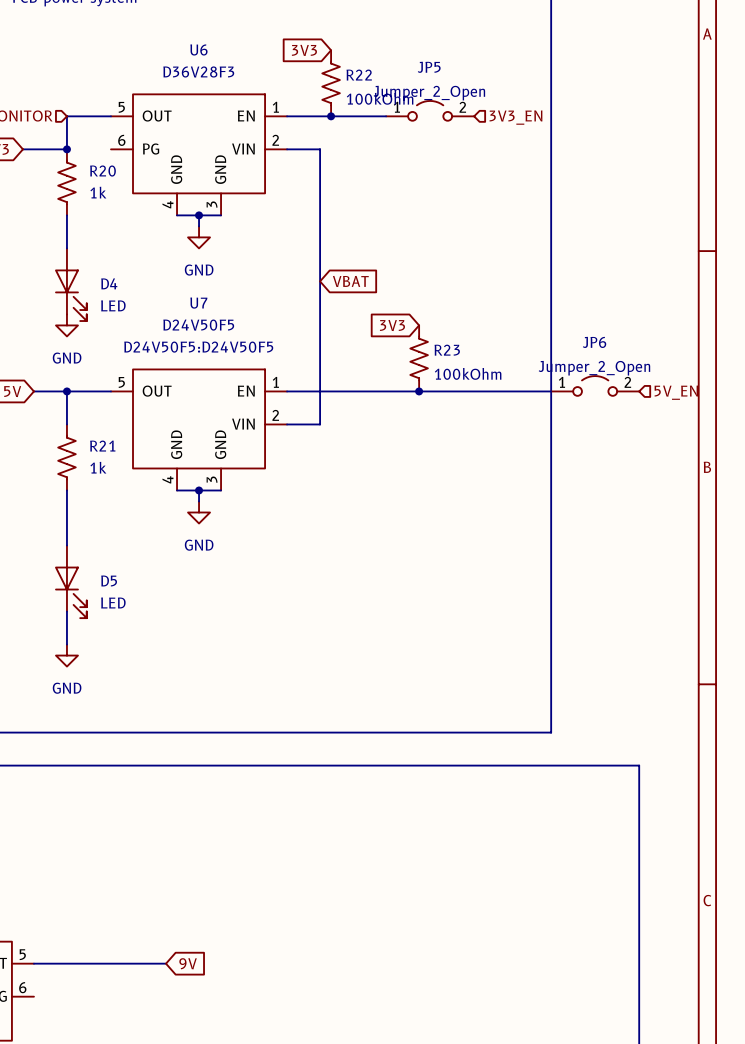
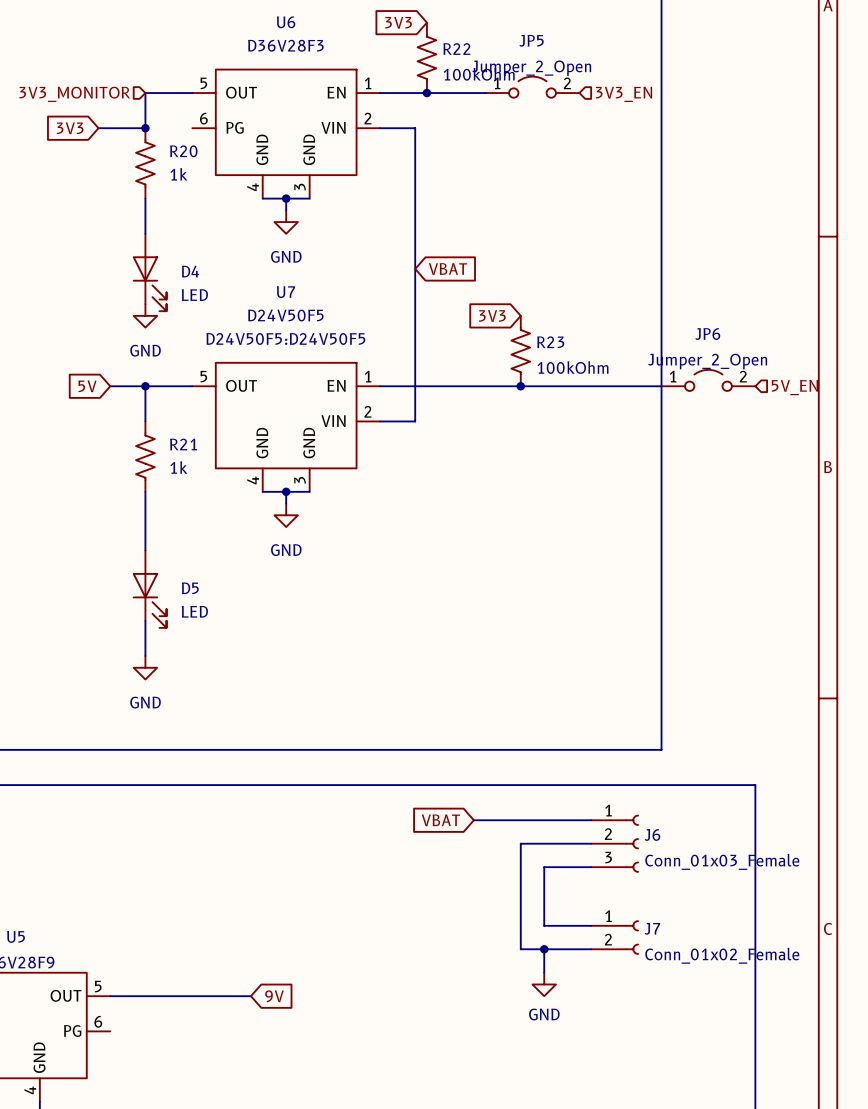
global label: none -> VBAT (440, 820)
wire: none -> (473, 820) (591, 820)
wire: none -> (591, 843) (520, 843) (520, 949) (591, 949)
J6: none -> Conn_01x03_Female (614, 843)
wire: none -> (591, 867) (544, 867) (544, 925) (591, 925)
J7: none -> Conn_01x02_Female (614, 937)
wire: none -> (544, 949) (544, 972)
junction: none -> (544, 949)
power symbol: none -> GND (544, 984)

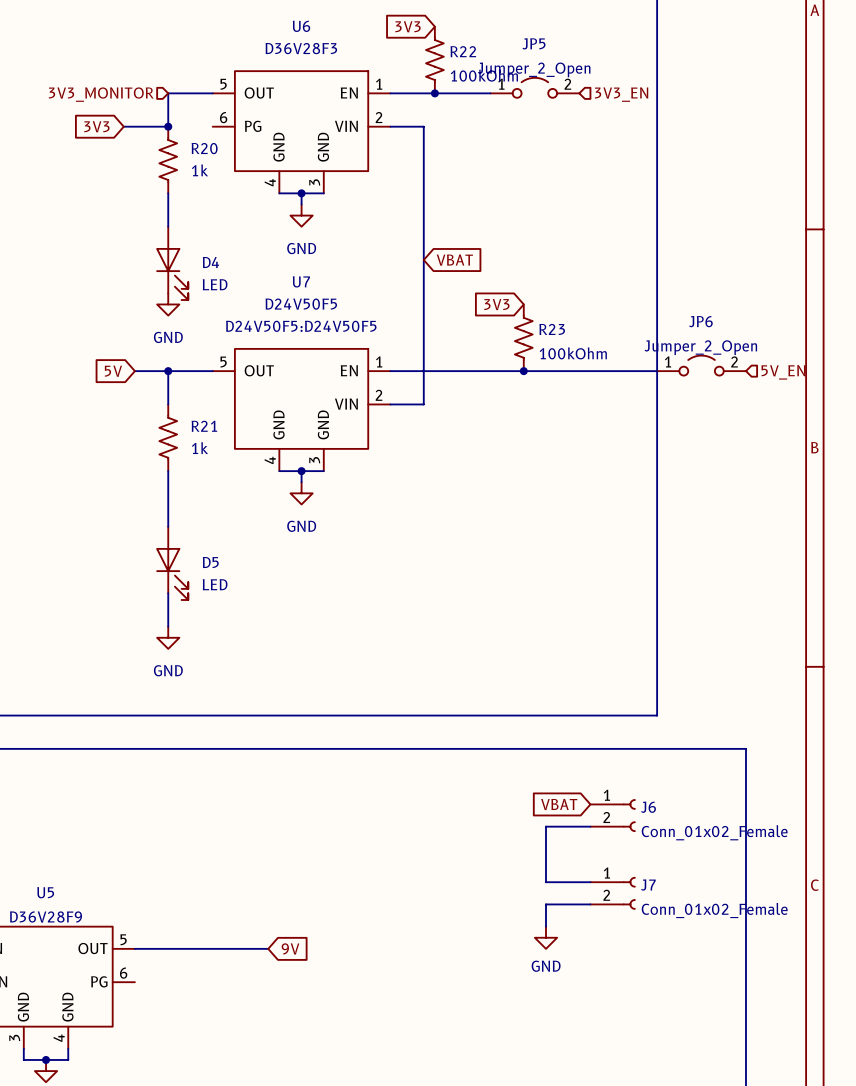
J6 symbol: [591, 814, 639, 873] -> [590, 799, 636, 832]
global label position: VBAT (440, 820) -> VBAT (559, 804)
wire: (473, 820) (591, 820) -> none
wire: (591, 843) (520, 843) (520, 949) (544, 949) -> none
J6 value: Conn_01x03_Female (722, 861) -> Conn_01x02_Female (714, 832)
junction: (544, 949) -> none

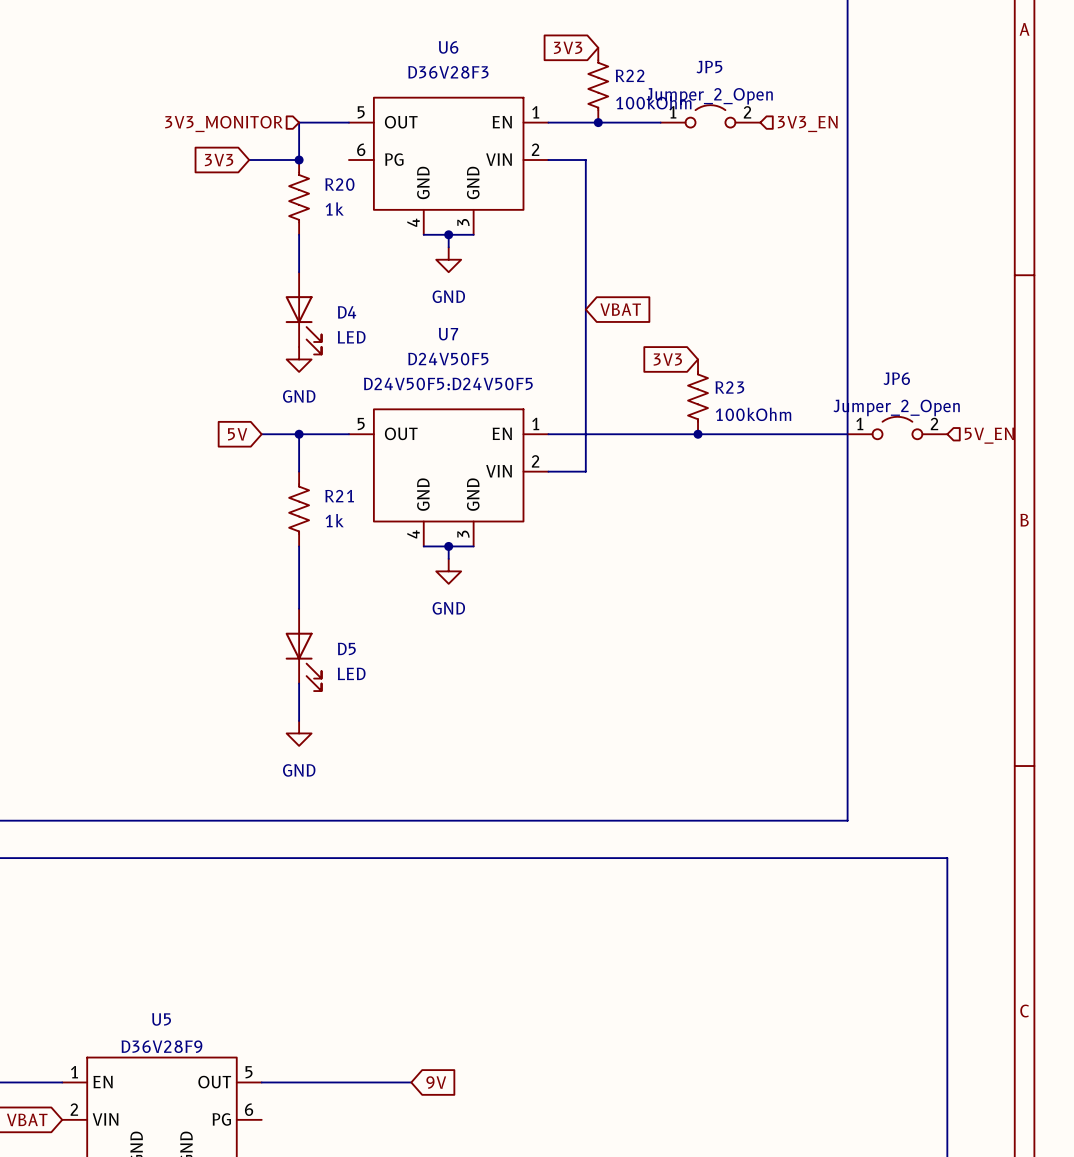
global label: VBAT (559, 804) -> none
J6: Conn_01x02_Female (613, 815) -> none
wire: (590, 826) (546, 826) (546, 882) (590, 882) -> none
J7: Conn_01x02_Female (613, 893) -> none
wire: (590, 904) (546, 904) (546, 926) -> none
power symbol: GND (546, 937) -> none

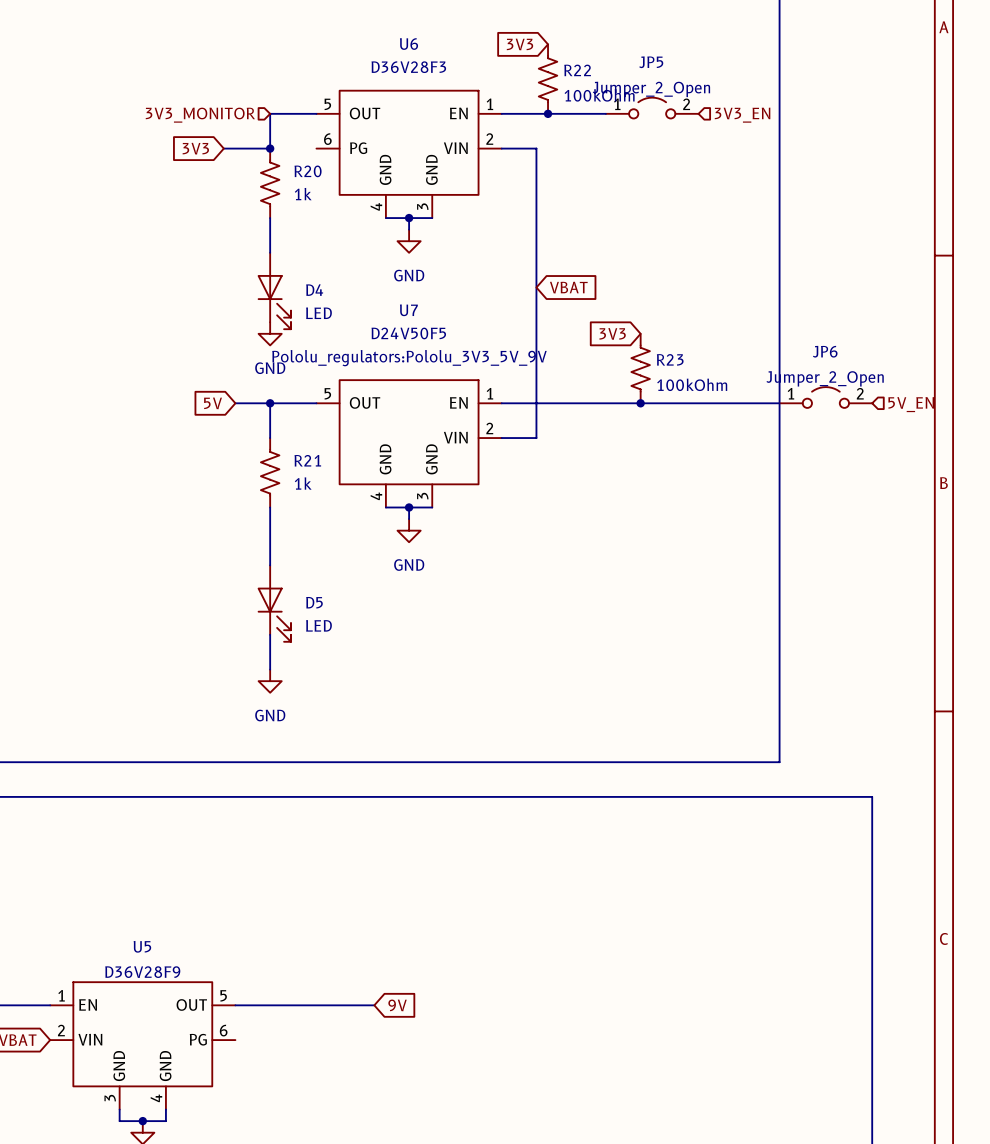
U7 text: D24V50F5:D24V50F5 (448, 384) -> Pololu_regulators:Pololu_3V3_5V_9V (409, 358)

